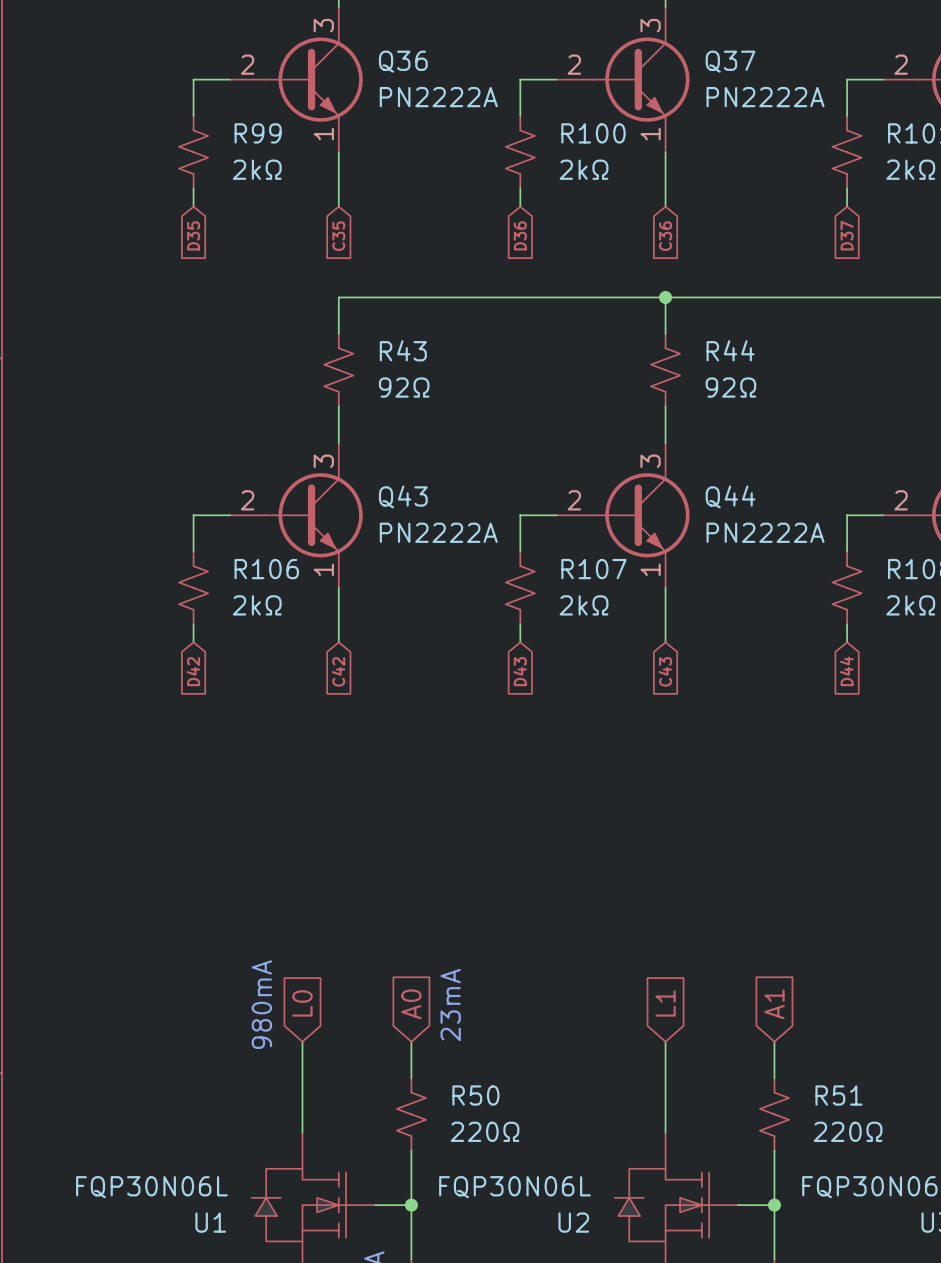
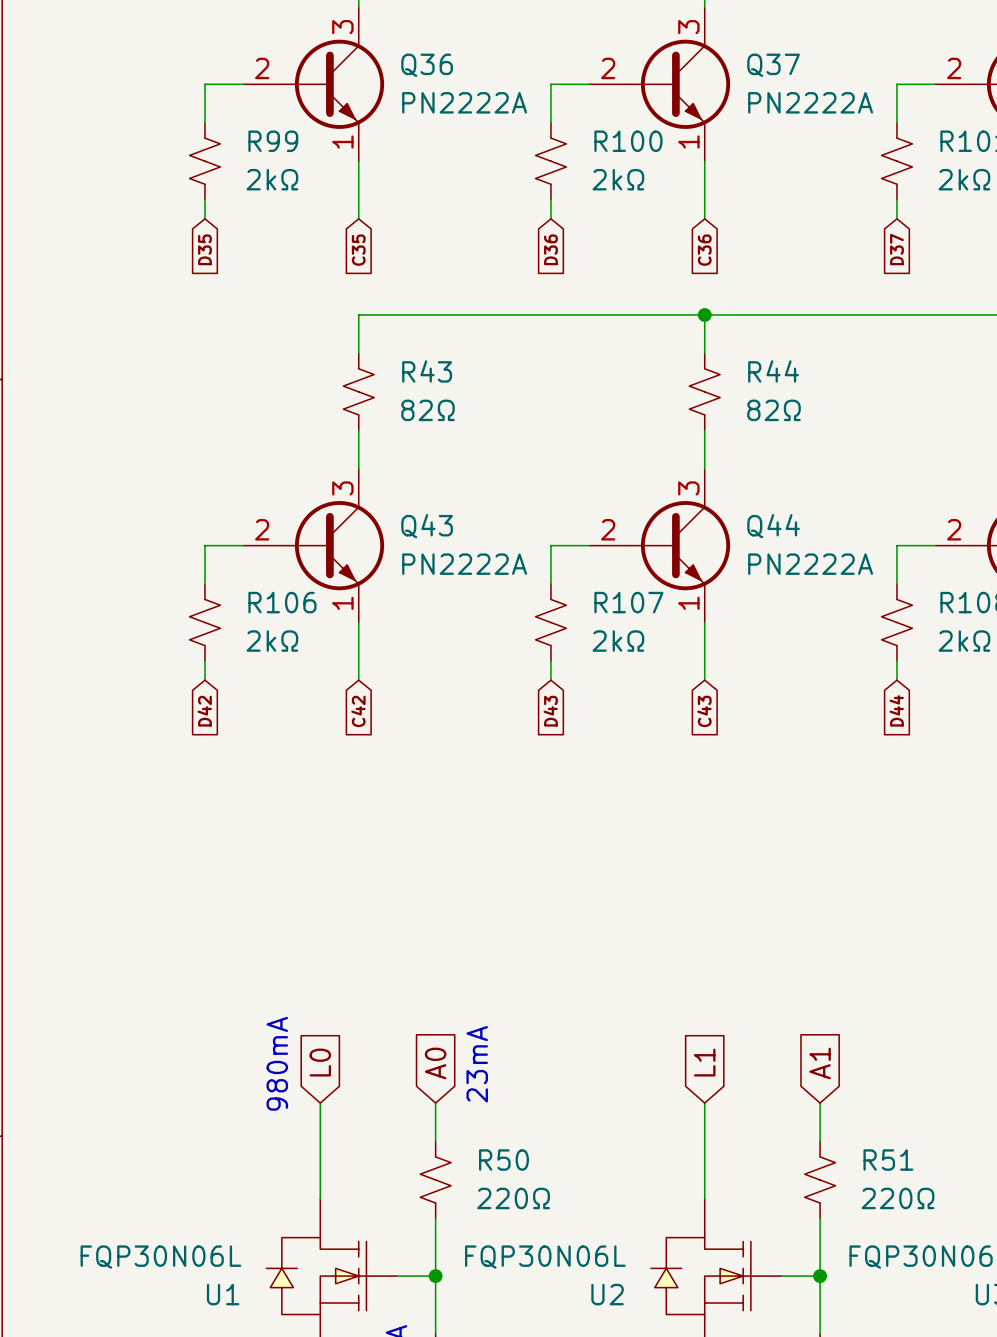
R43 value: 92Ω (404, 387) -> 82Ω (427, 410)
R44 value: 92Ω (730, 387) -> 82Ω (773, 410)

